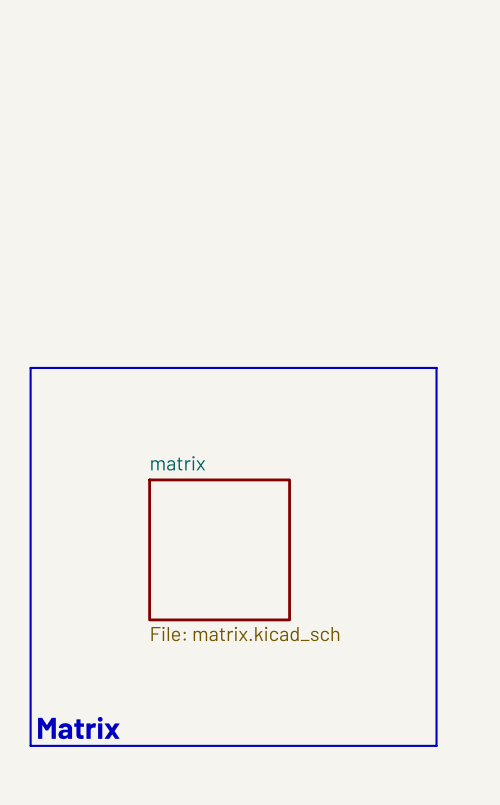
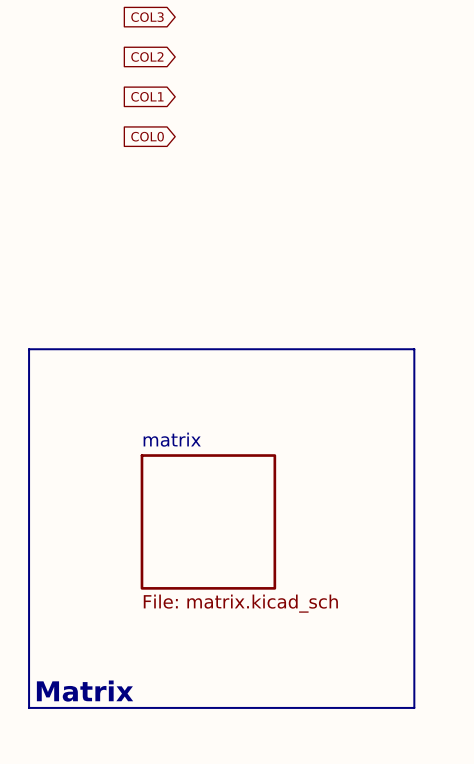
global label: none -> COL3 (147, 17)
global label: none -> COL2 (147, 56)
global label: none -> COL1 (147, 96)
global label: none -> COL0 (147, 136)

